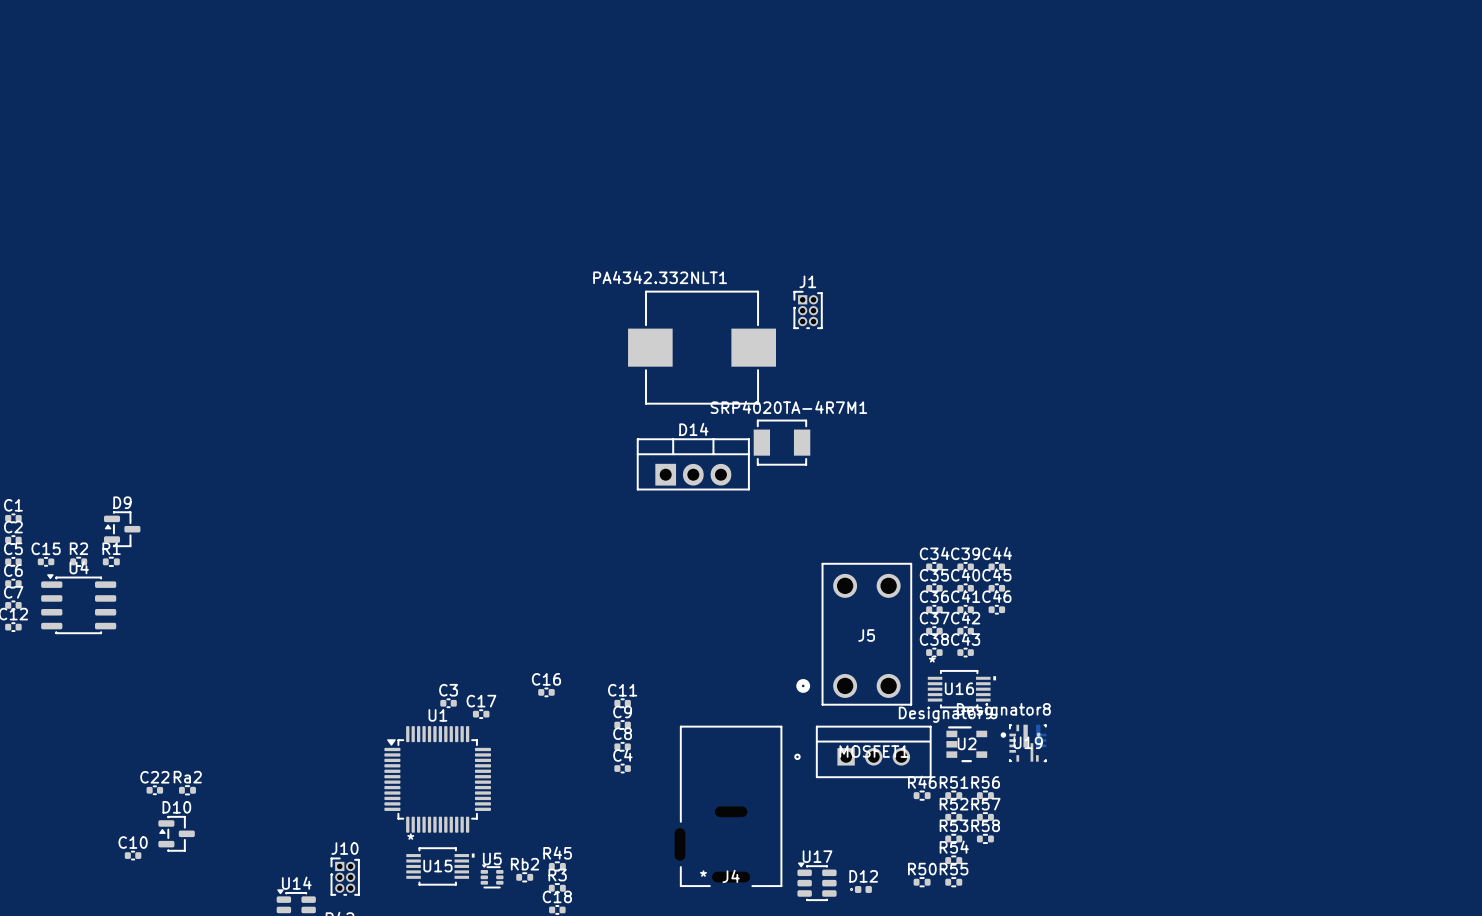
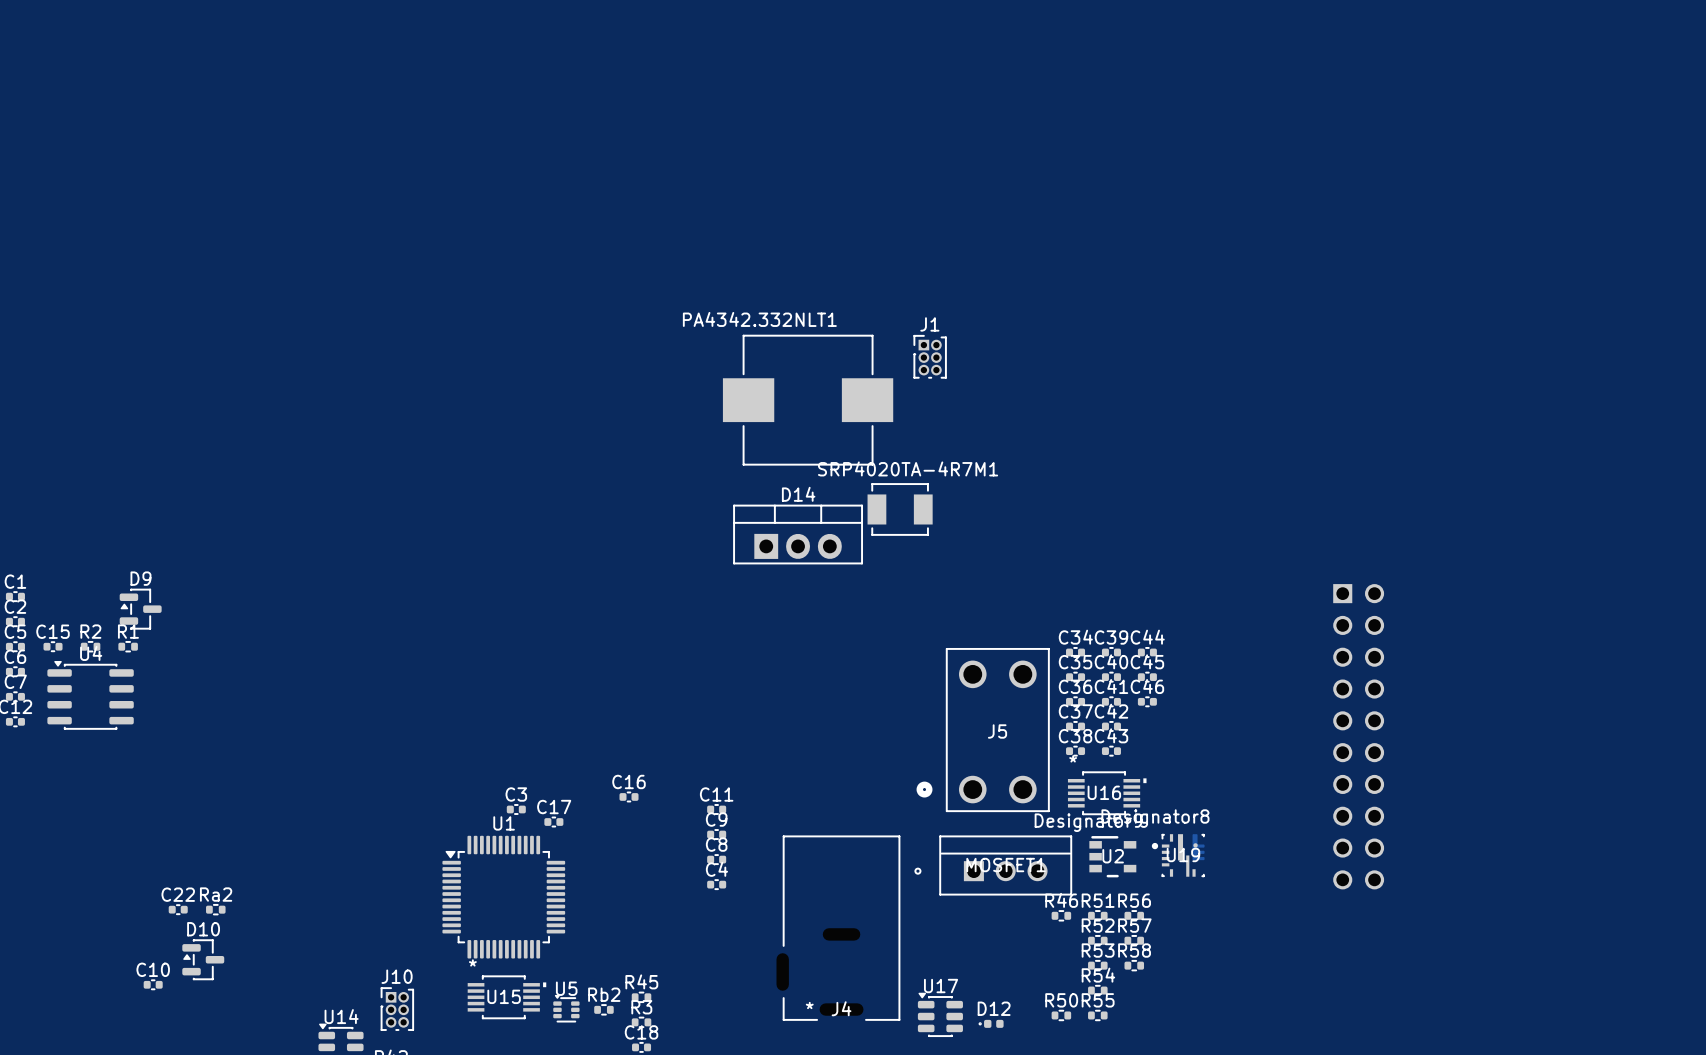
part: none -> (1358, 736)

